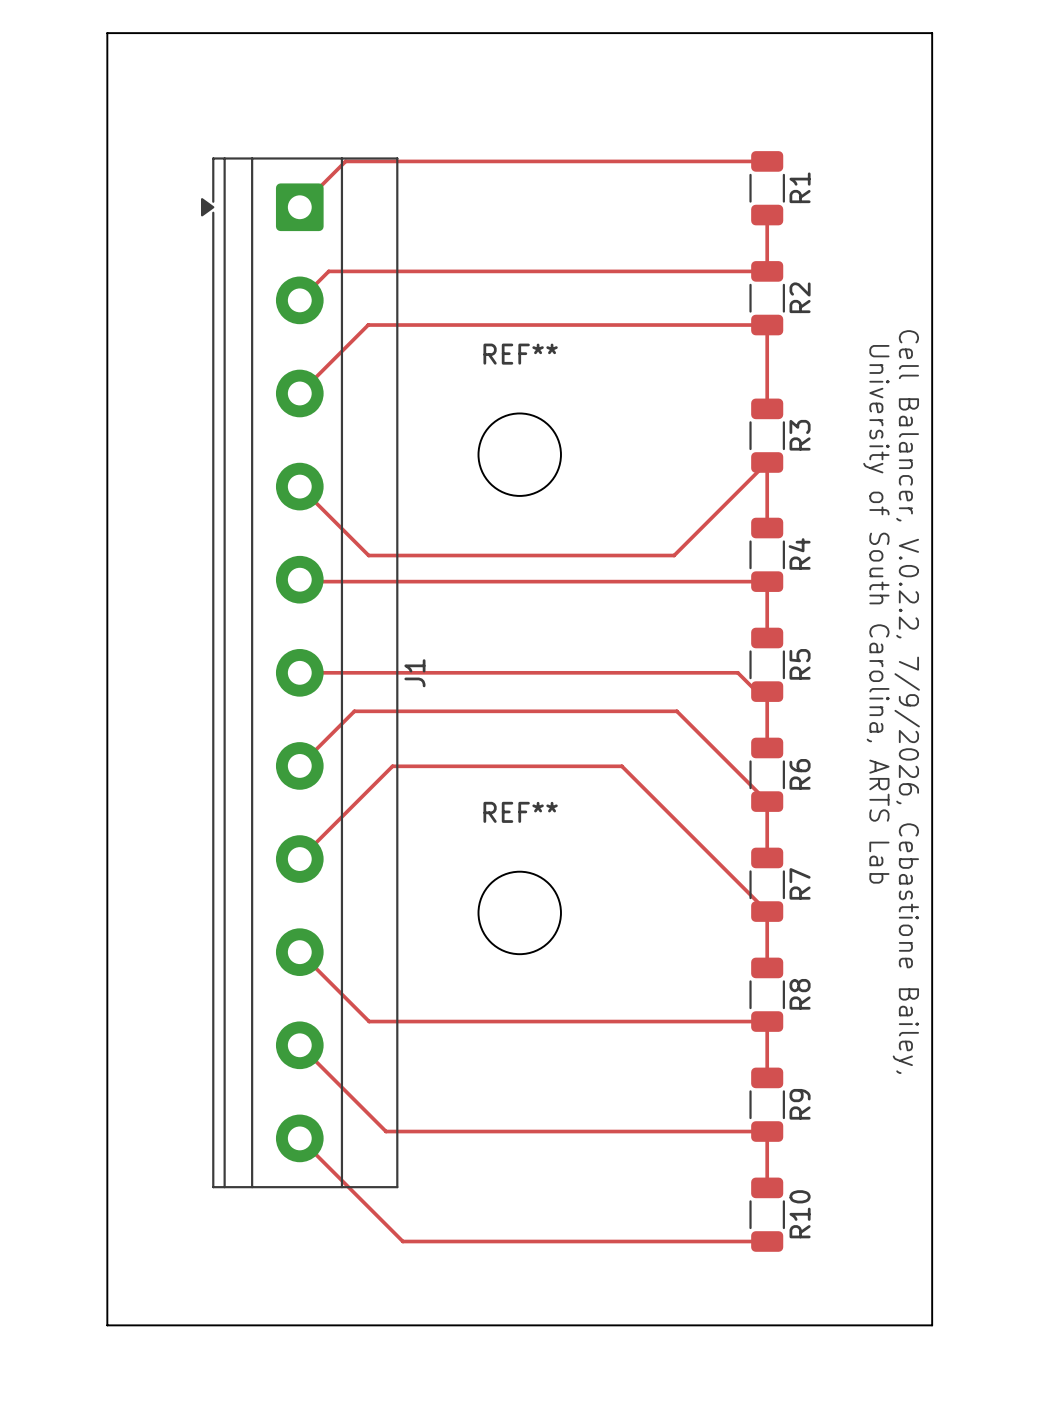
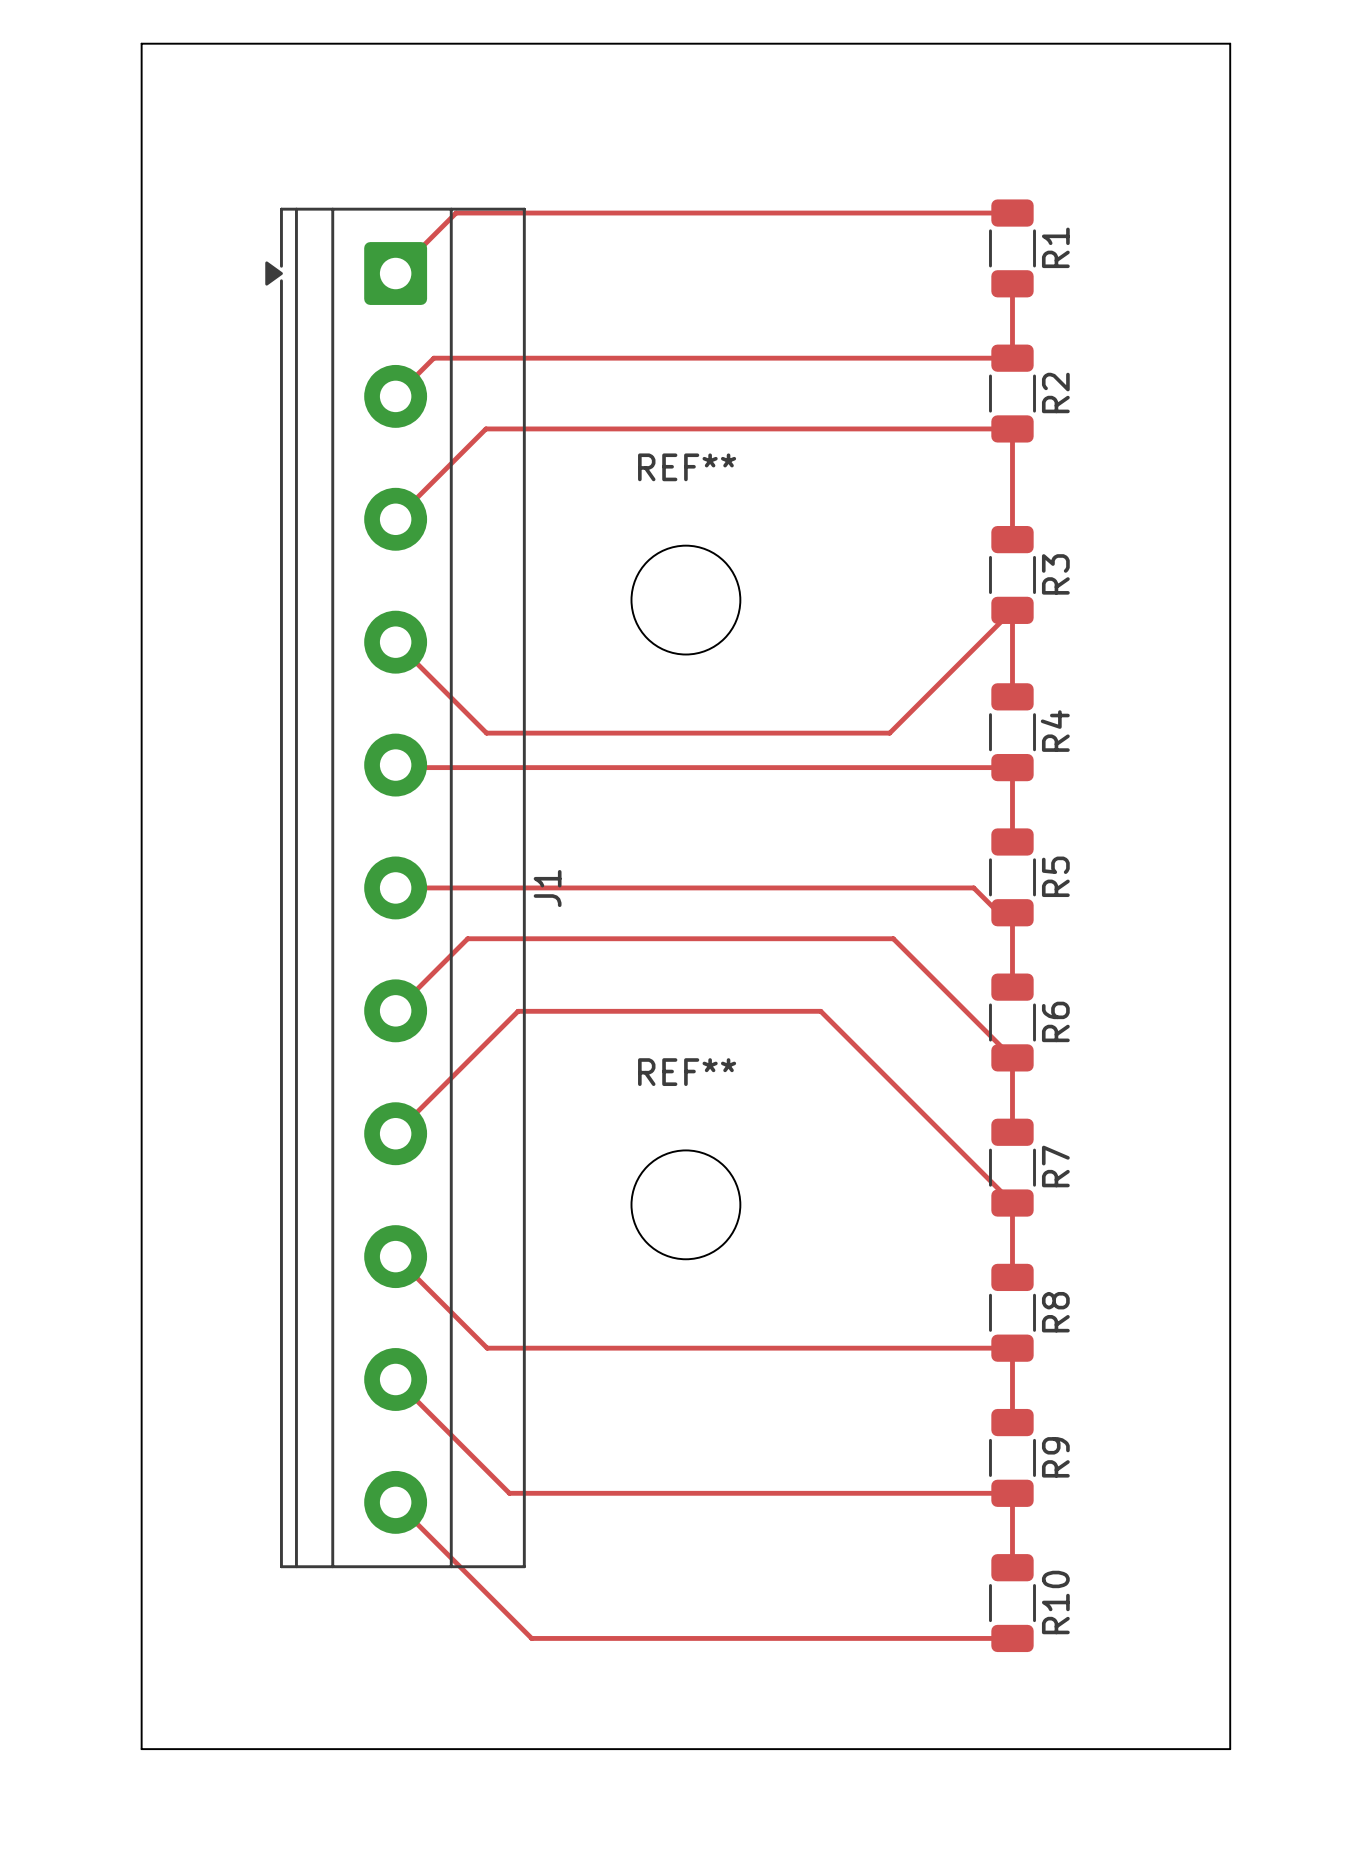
text: University of South Carolina, ARTS Lab (876, 614) -> none
text: Cell Balancer, V.0.2.2, 7/9/2026, Cebastione Bailey, (906, 702) -> none

